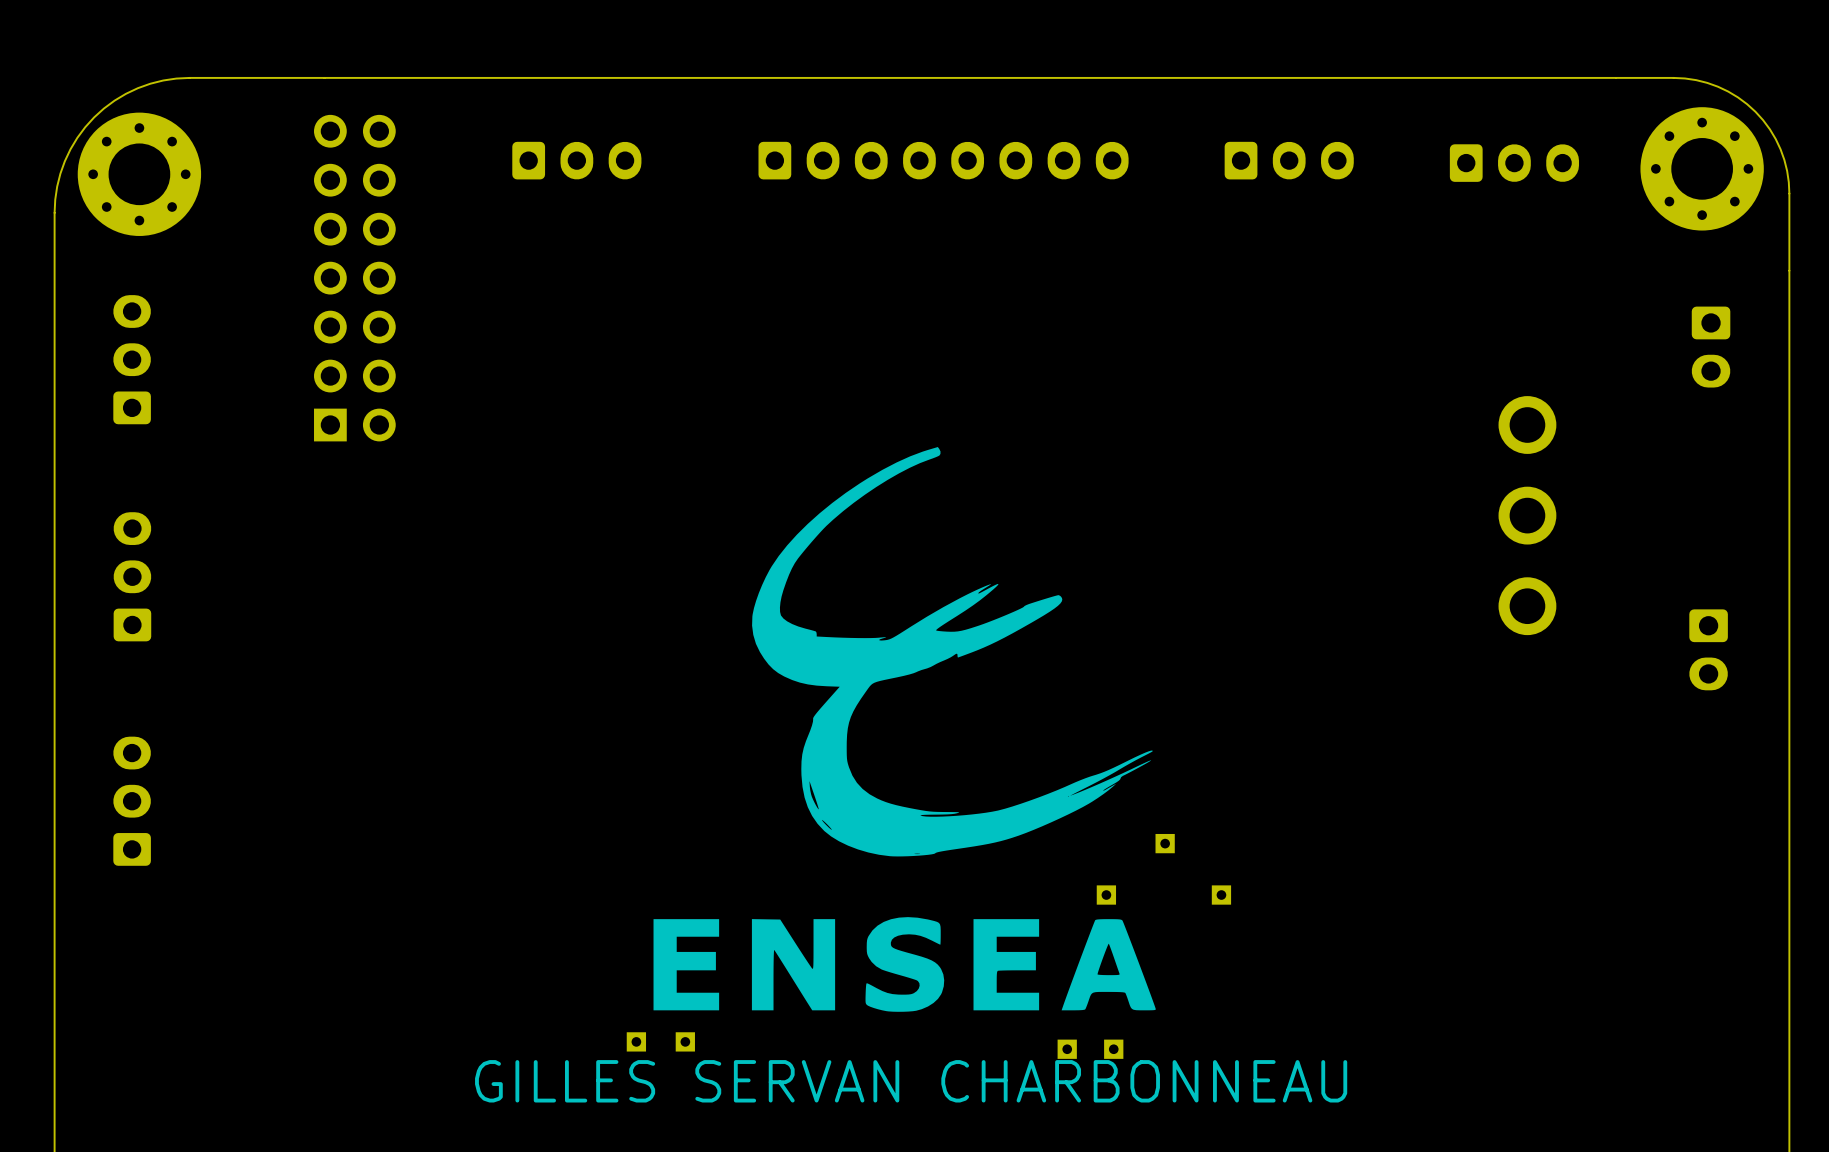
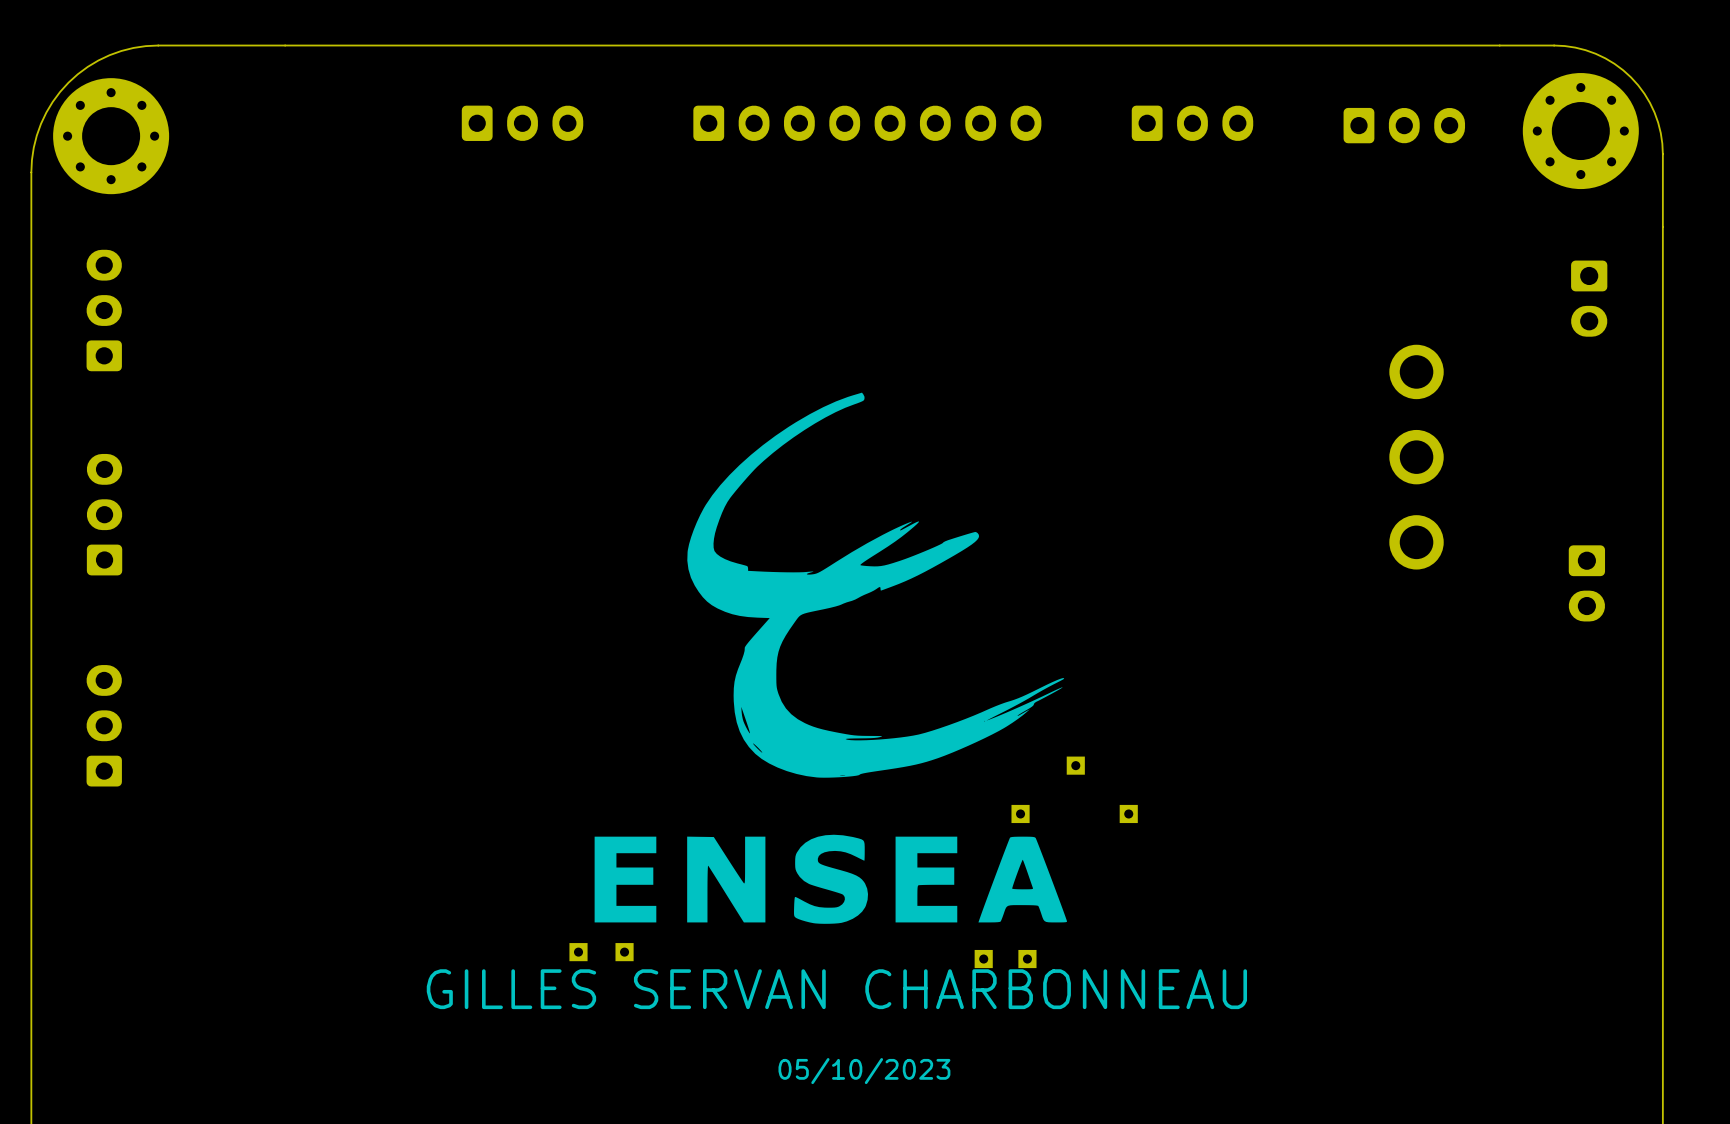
part: (354, 278) -> none

